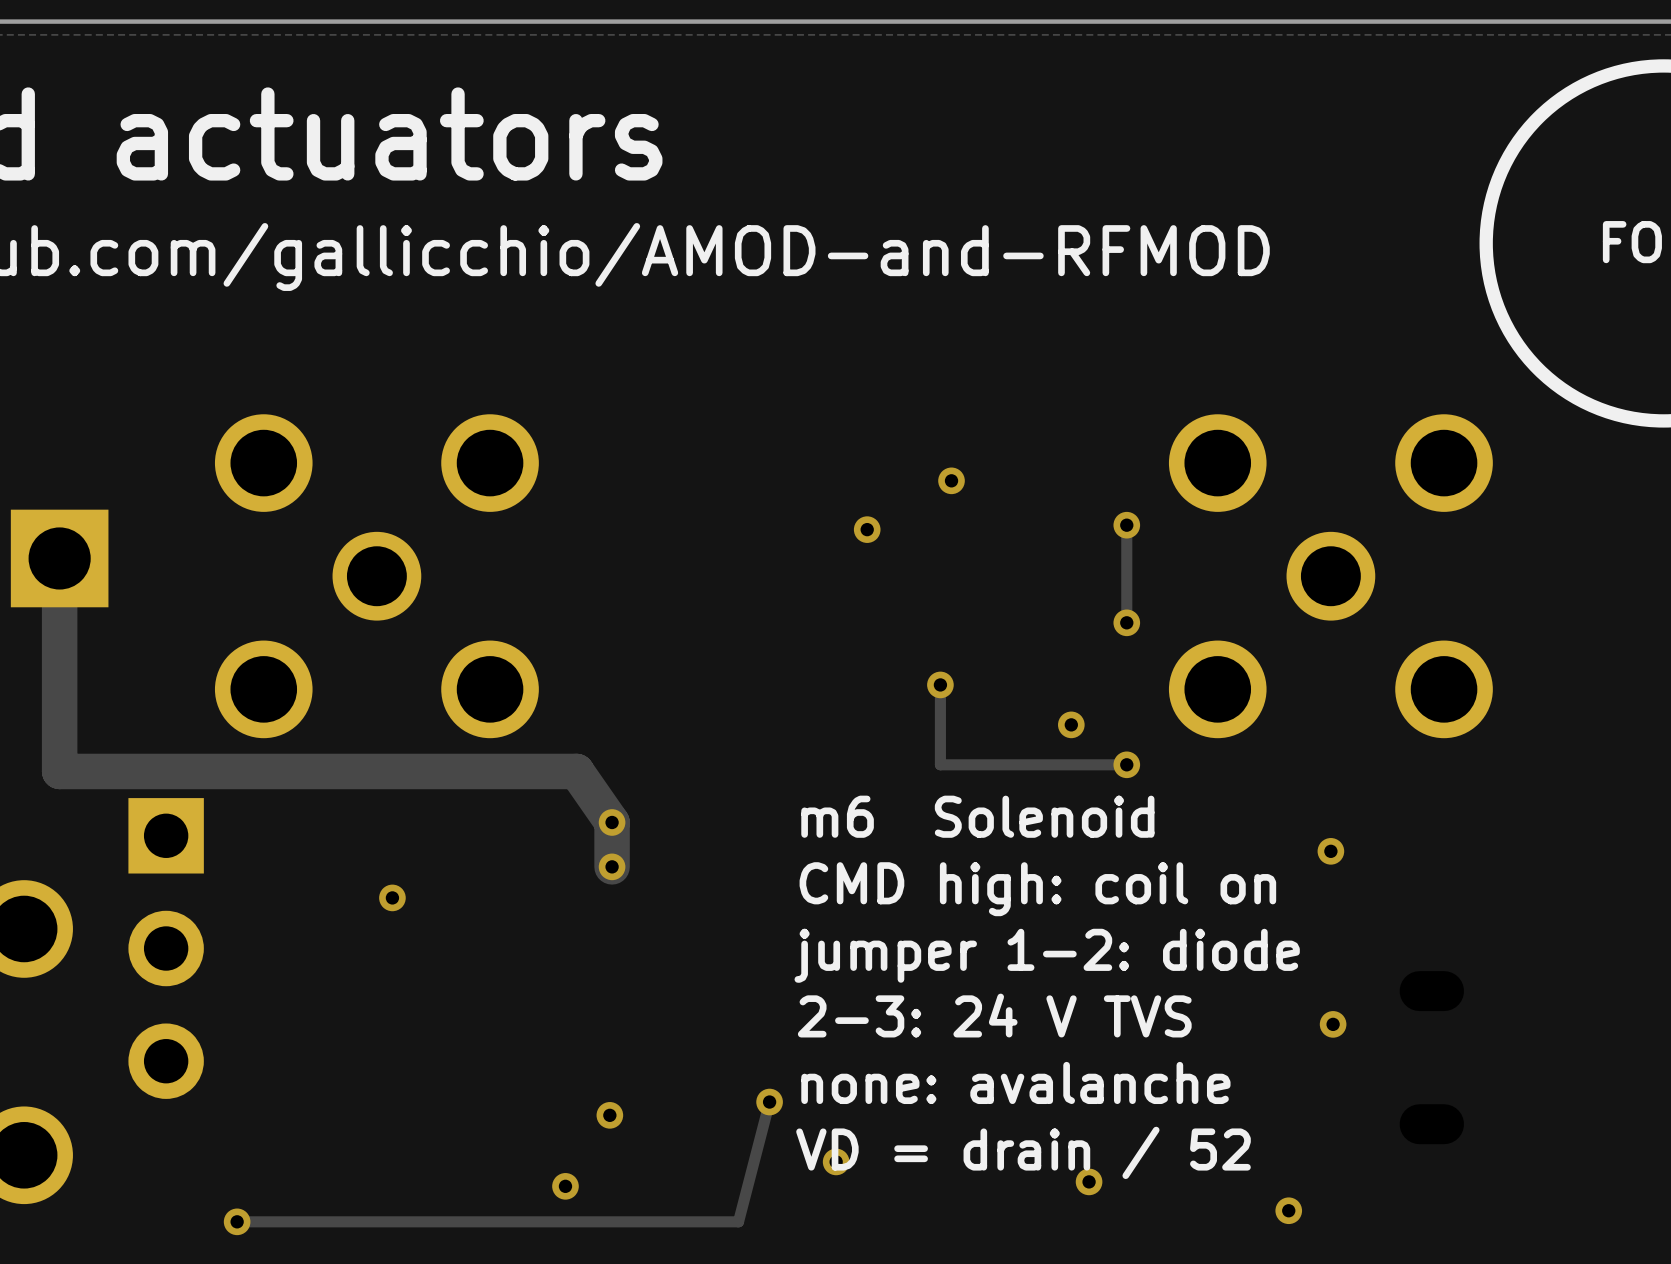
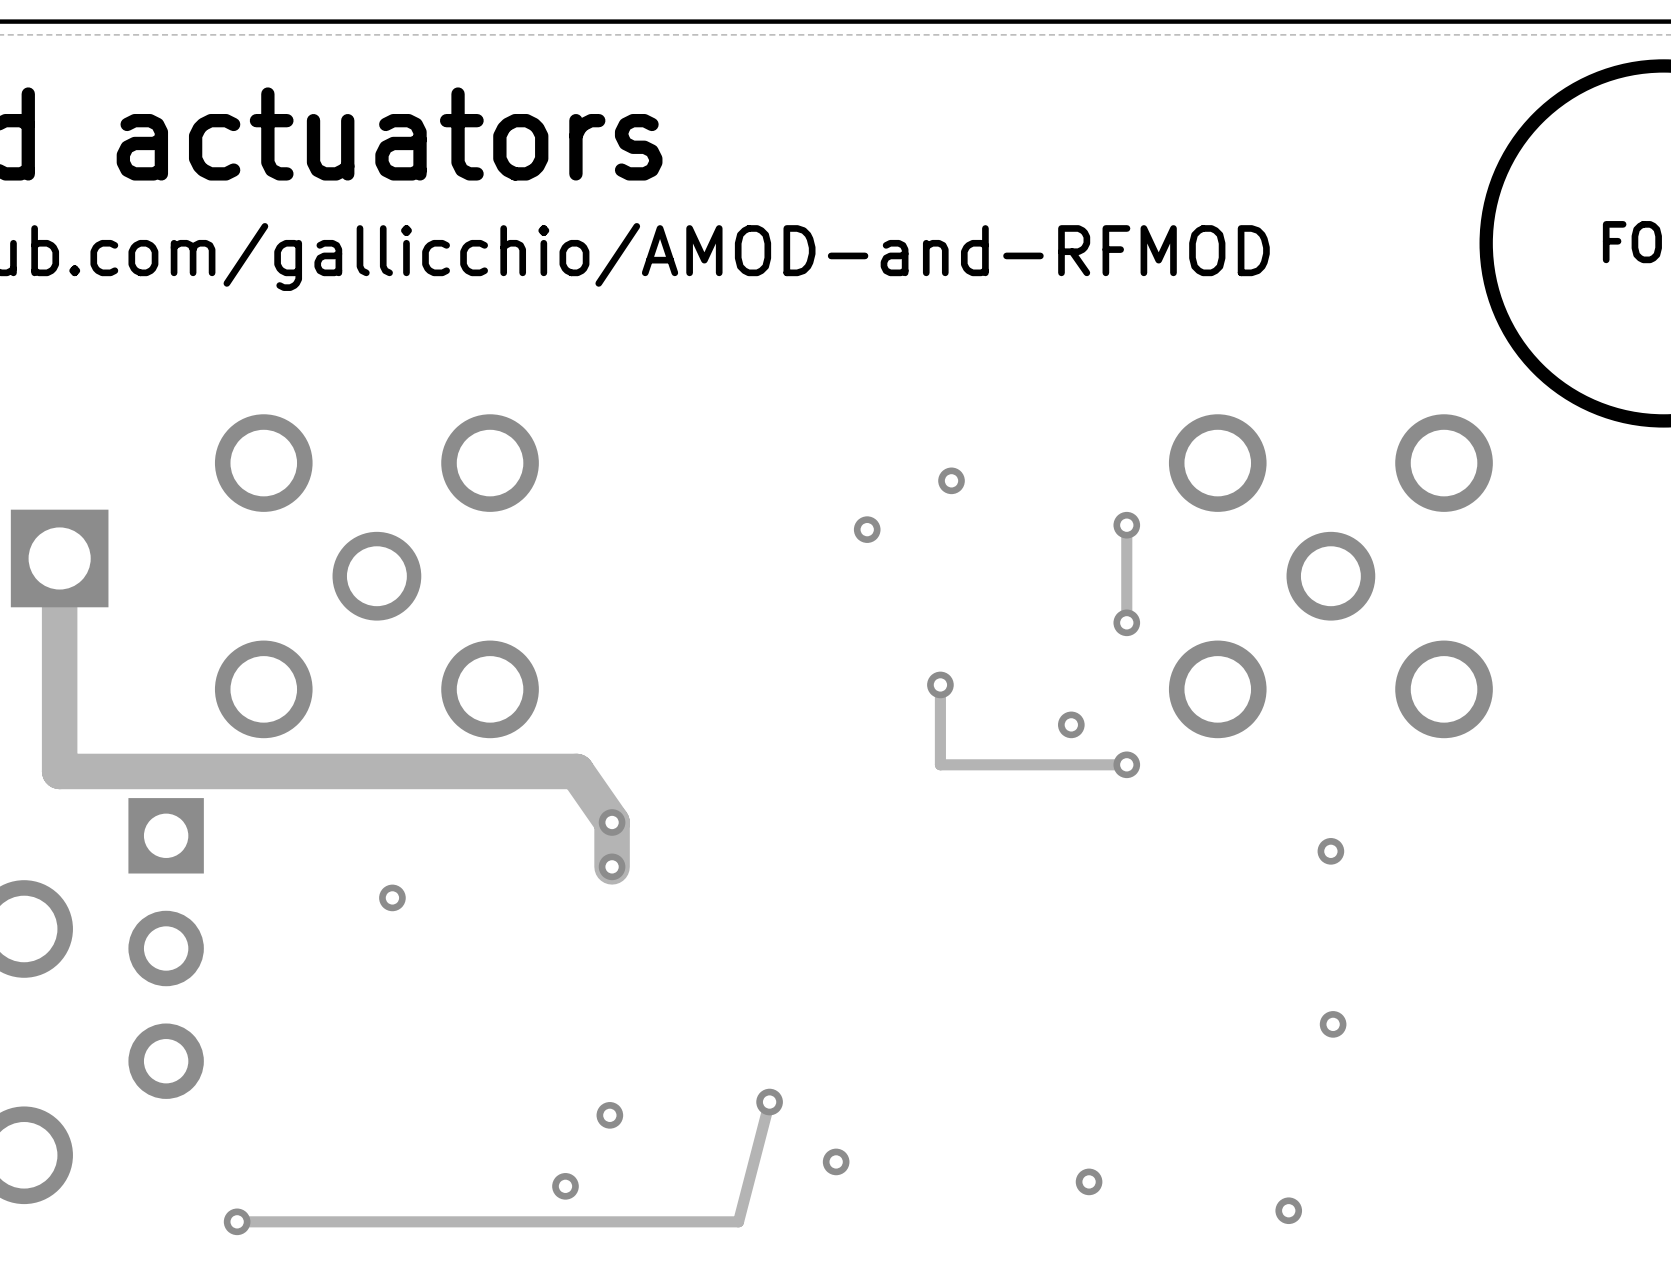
text: m6 Solenoid (977, 816) -> none
text: CMD high: coil on (1037, 889) -> none
text: jumper 1-2: diode (1047, 955) -> none
text: 2-3: 24 V TVS (994, 1015) -> none
text: none: avalanche (1015, 1082) -> none
text: VD = drain / 52 (1023, 1152) -> none

